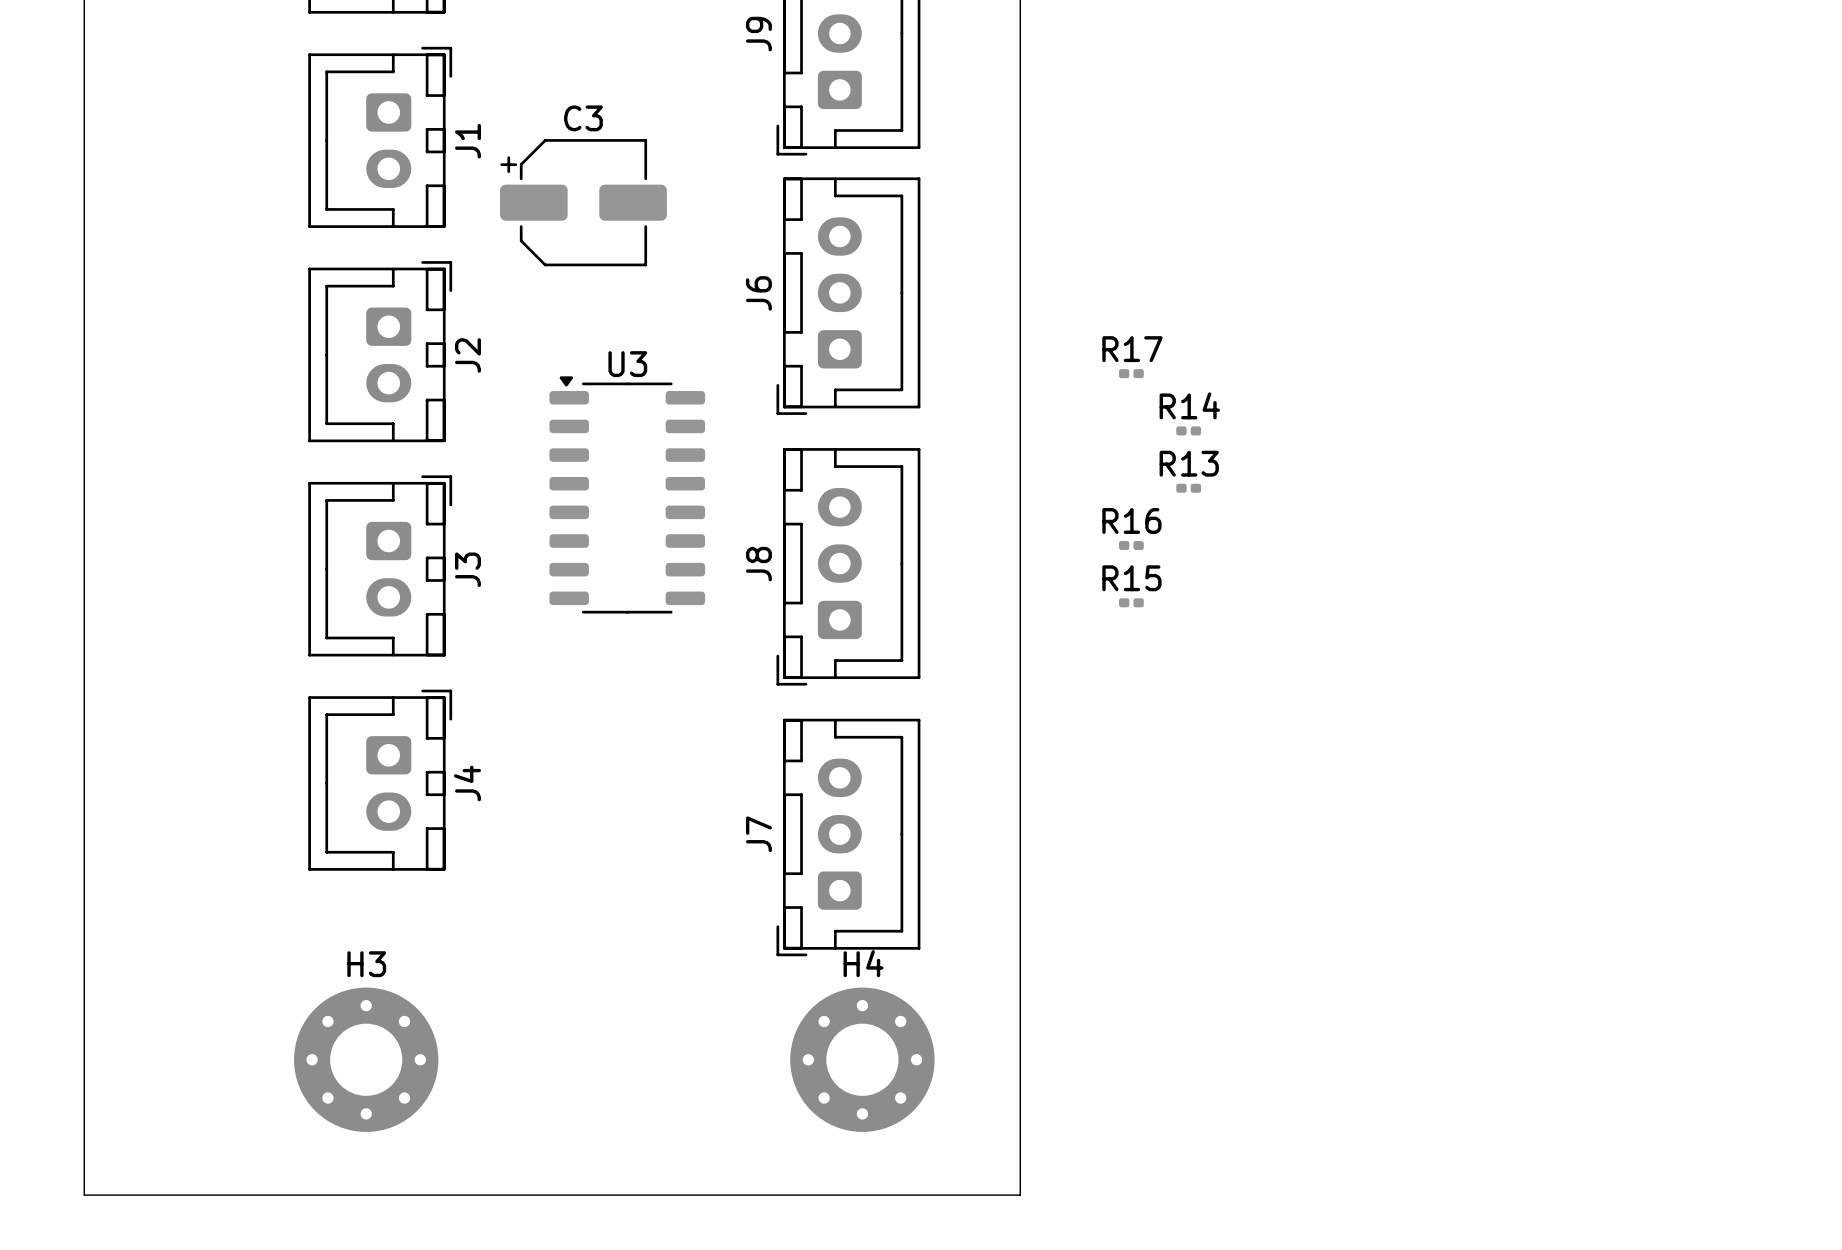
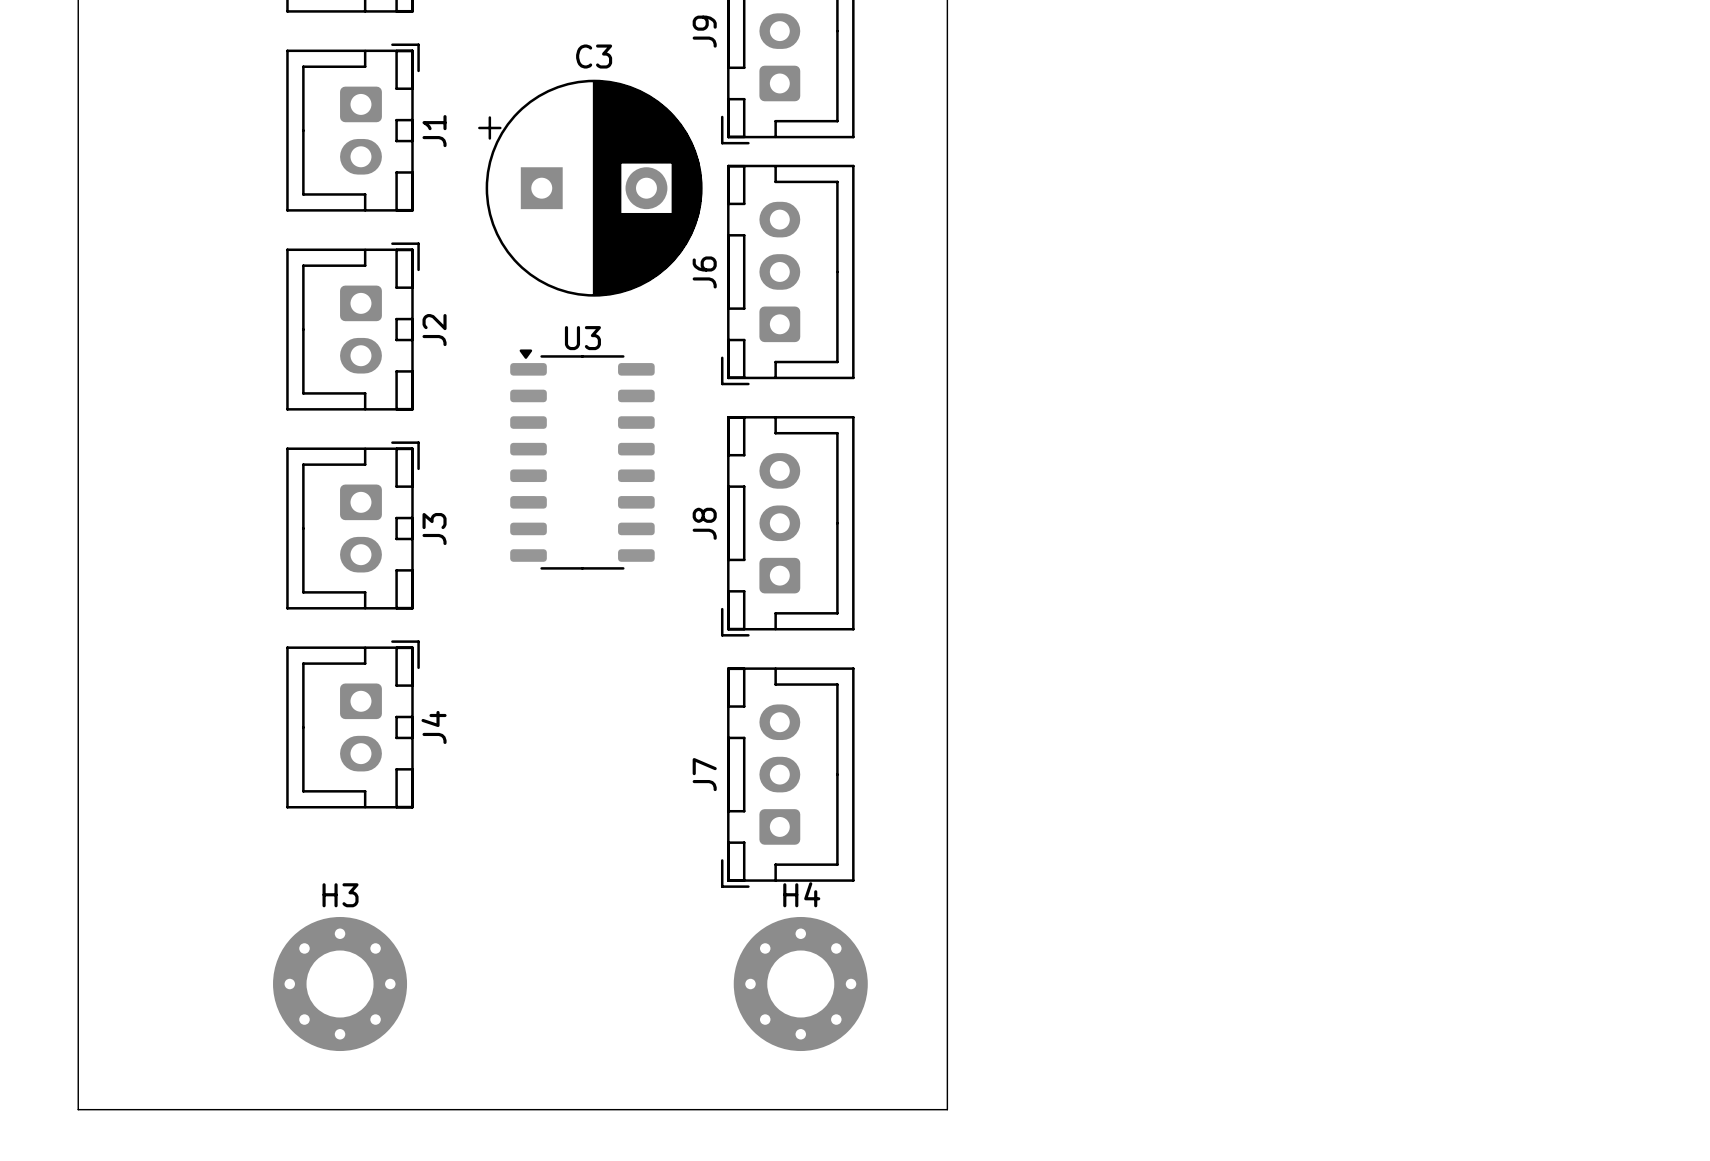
C3 name position: C3 (583, 118) -> C3 (594, 56)
C3 footprint: [500, 139, 667, 267] -> [478, 79, 703, 297]
R17: (1131, 373) -> none
R14: (1188, 430) -> none
R13: (1188, 488) -> none
R16: (1131, 545) -> none
R15: (1131, 602) -> none

